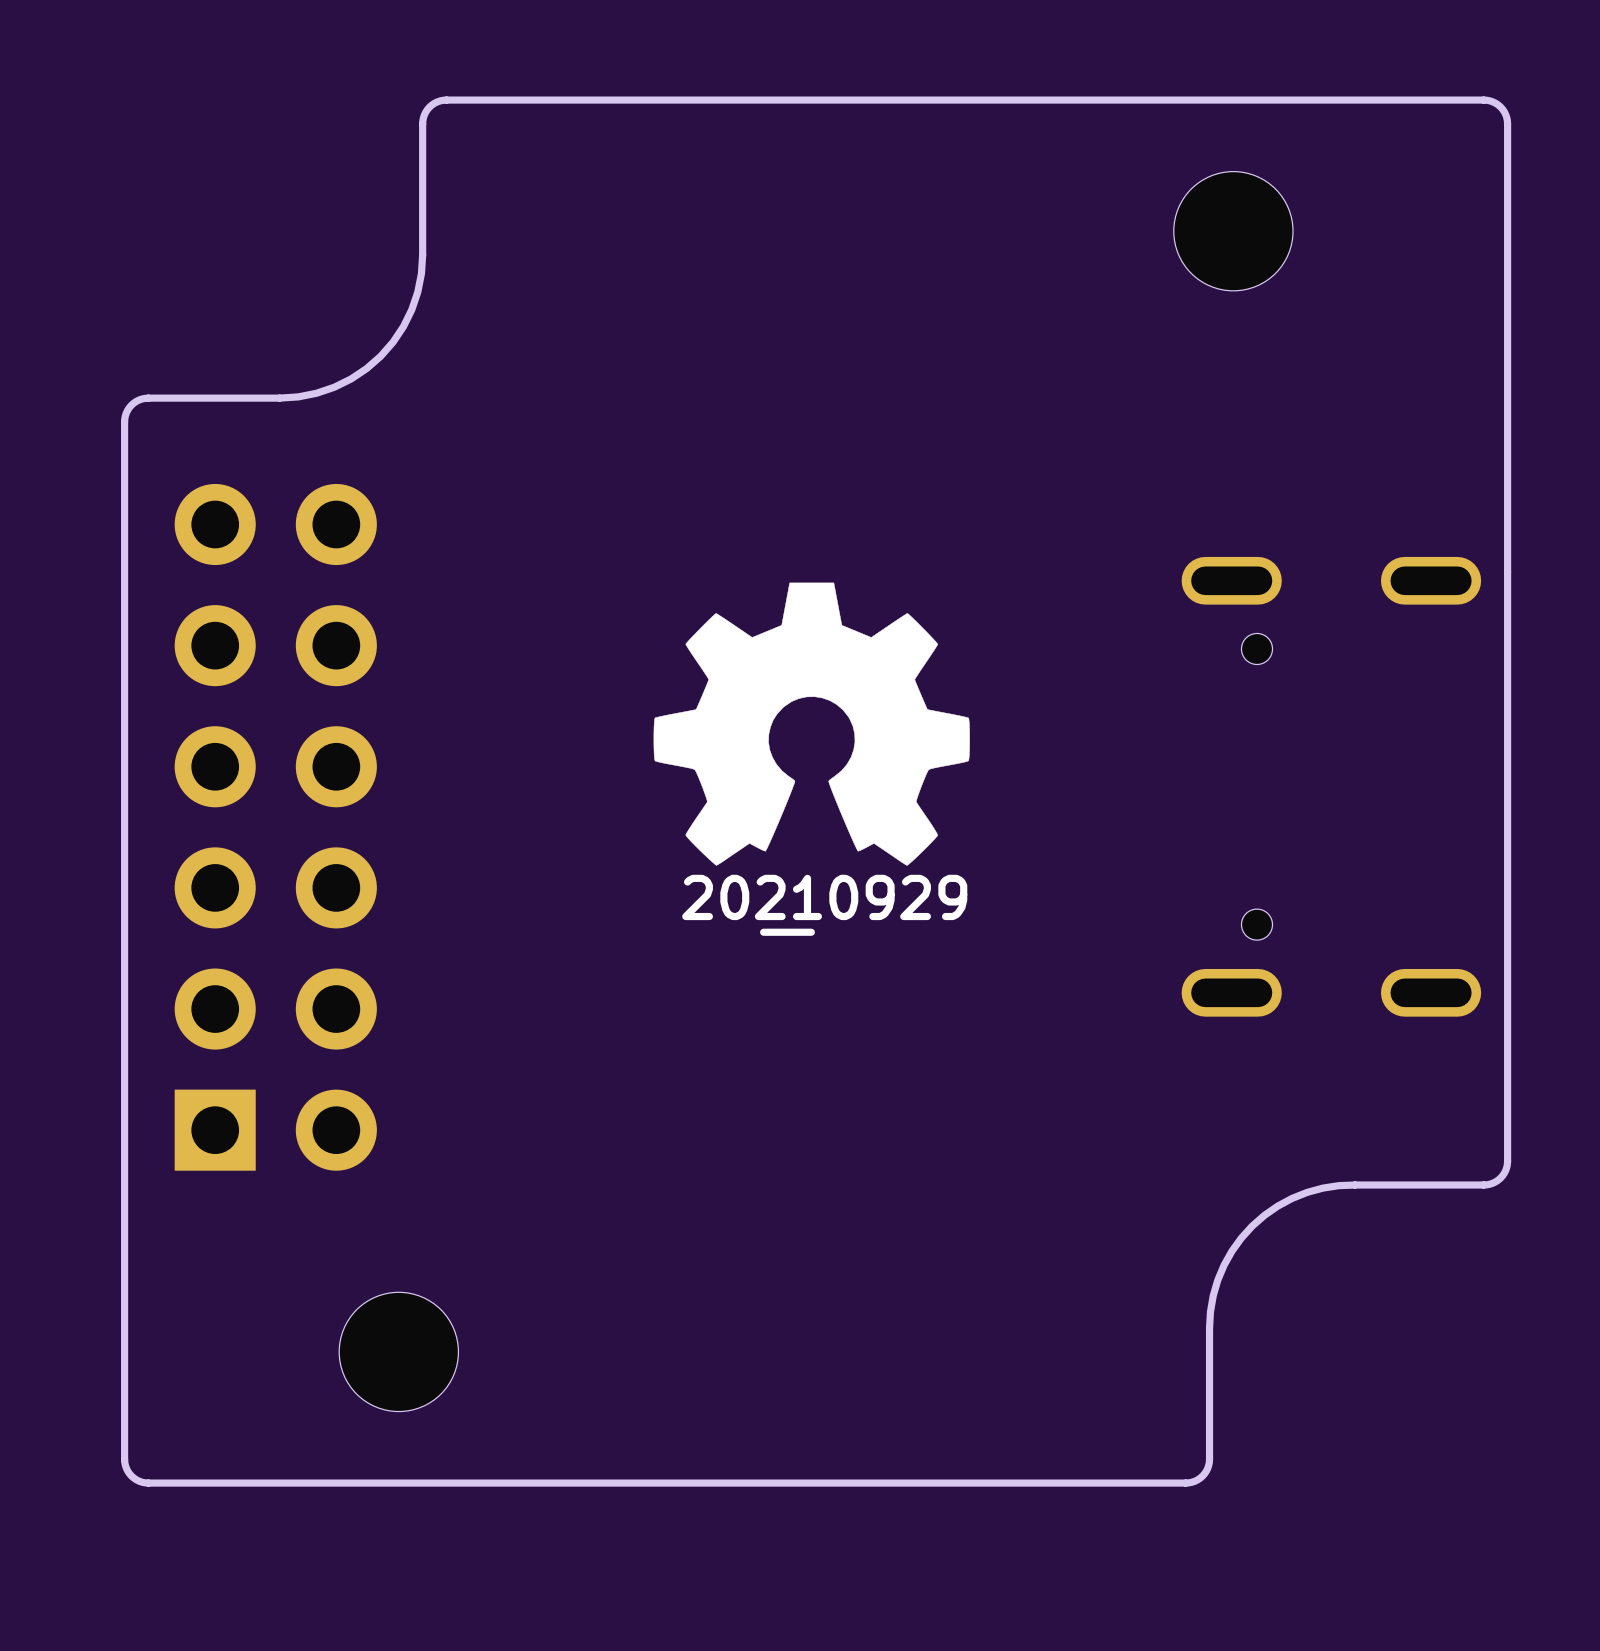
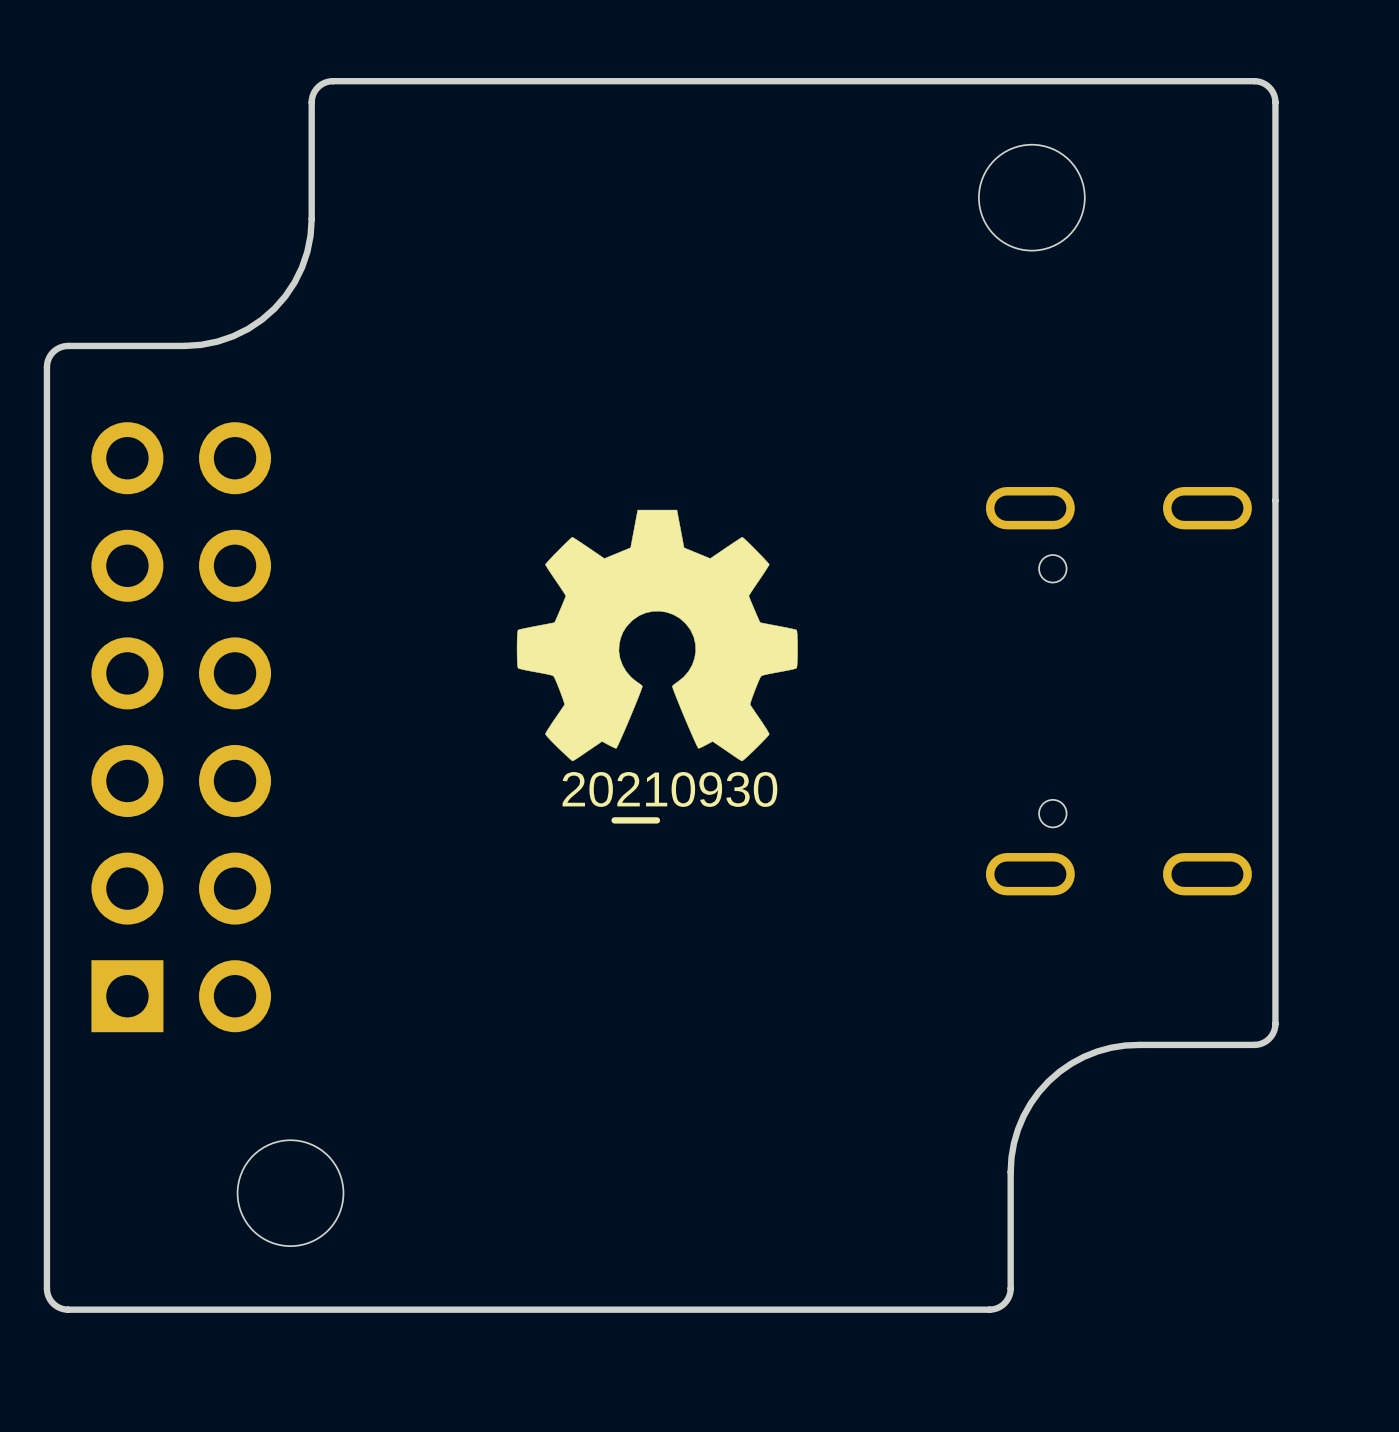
drawing shape: [682, 874, 968, 936] -> [562, 772, 778, 824]

